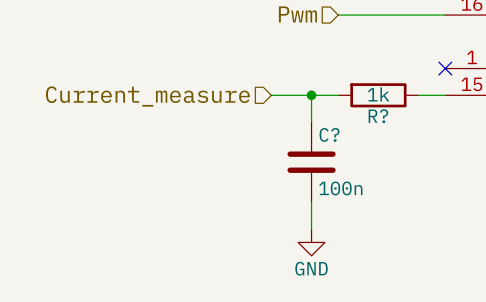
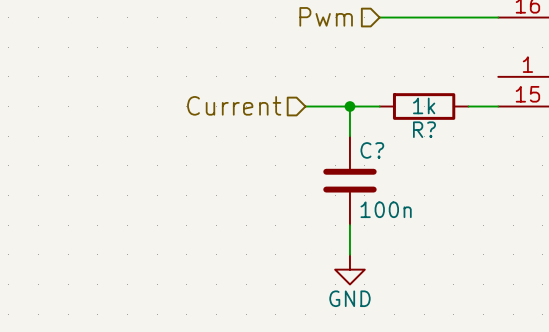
no-connect mark: (445, 68) -> none
hierarchical label: Current_measure (147, 96) -> Current (234, 105)

